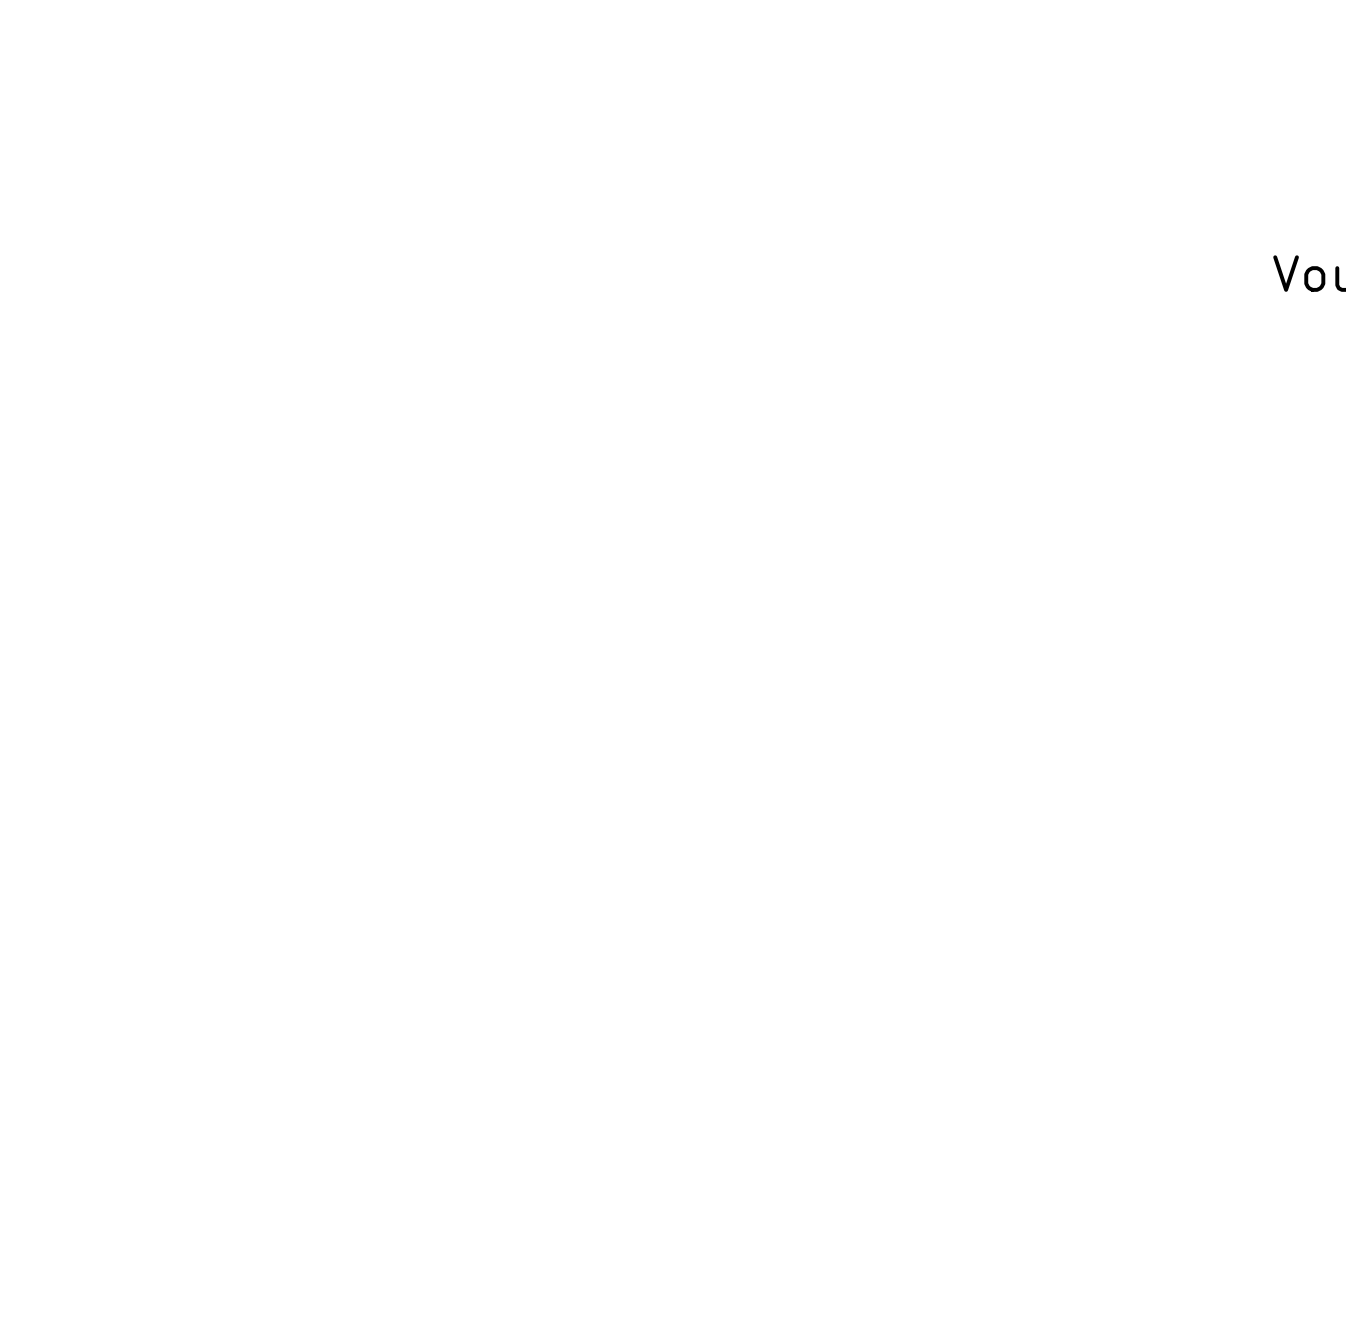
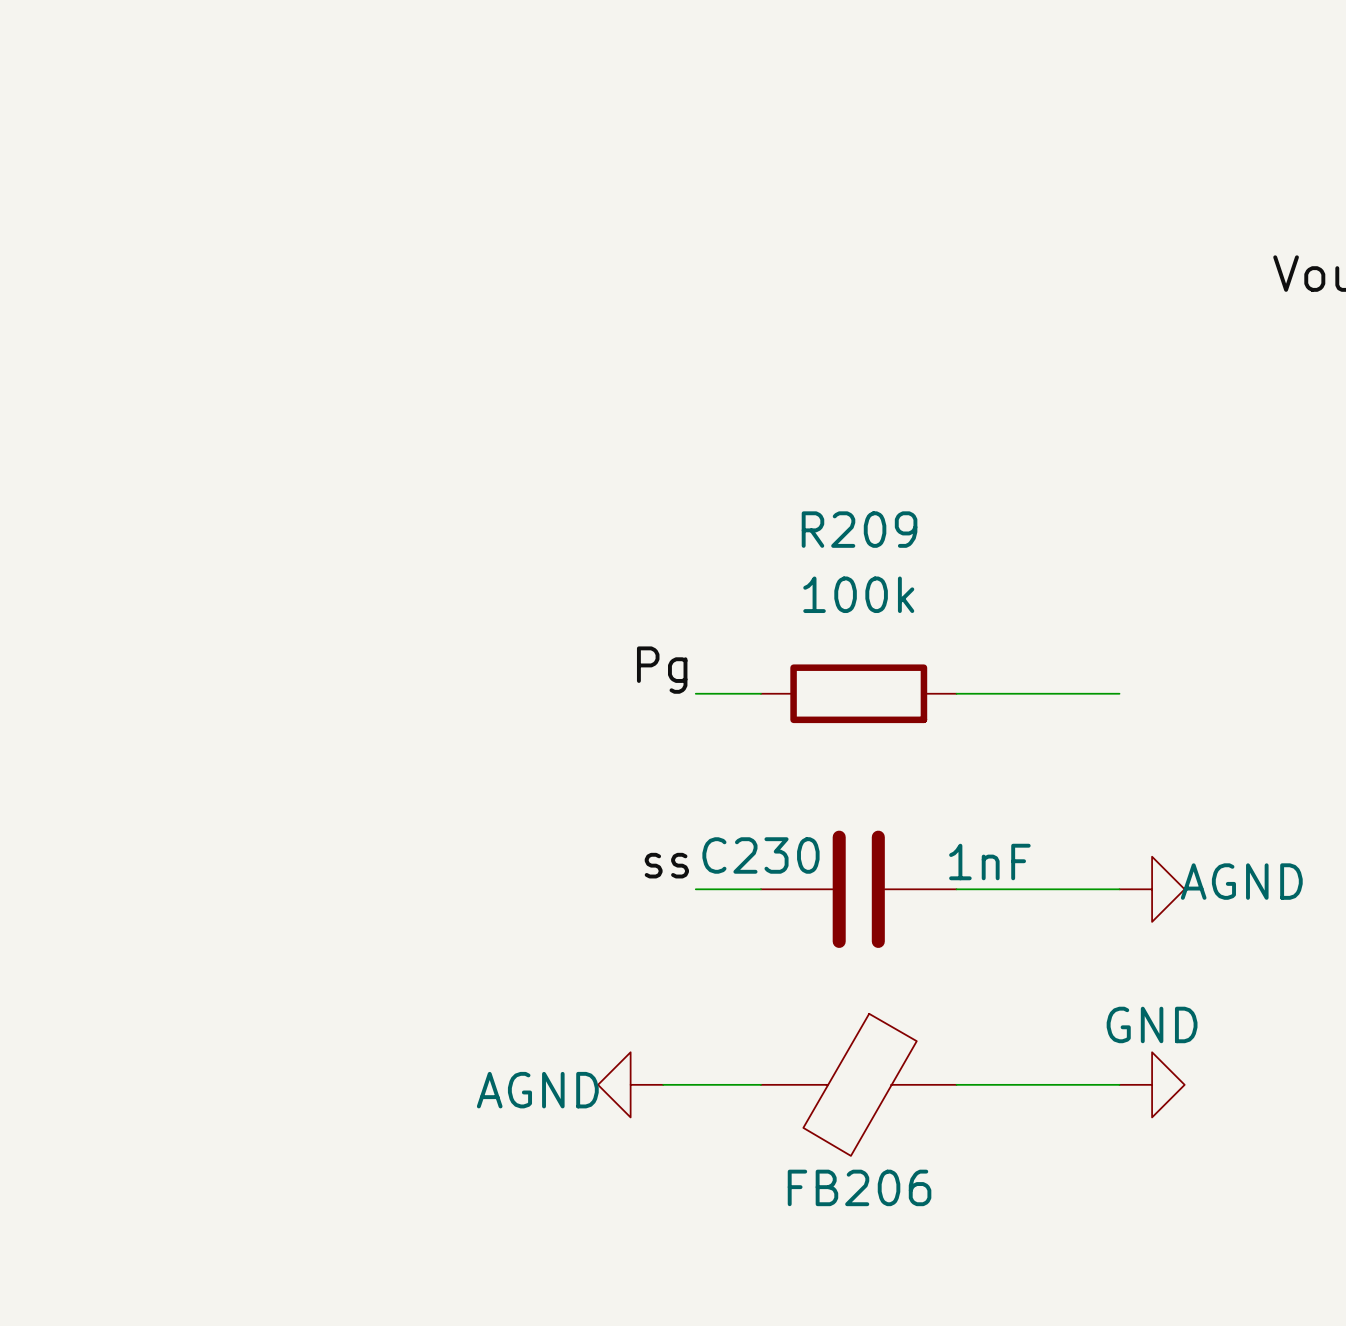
label: none -> Pg (662, 670)
wire: none -> (695, 693) (760, 693)
R209: none -> 100k (858, 693)
wire: none -> (956, 693) (1119, 693)
label: none -> ss (666, 865)
wire: none -> (695, 889) (760, 889)
C230: none -> 1nF (858, 889)
wire: none -> (956, 889) (1119, 889)
power symbol: none -> AGND (1152, 889)
power symbol: none -> AGND (630, 1084)
wire: none -> (663, 1084) (760, 1084)
FB206: none -> (858, 1084)
wire: none -> (956, 1084) (1119, 1084)
power symbol: none -> GND (1152, 1084)

